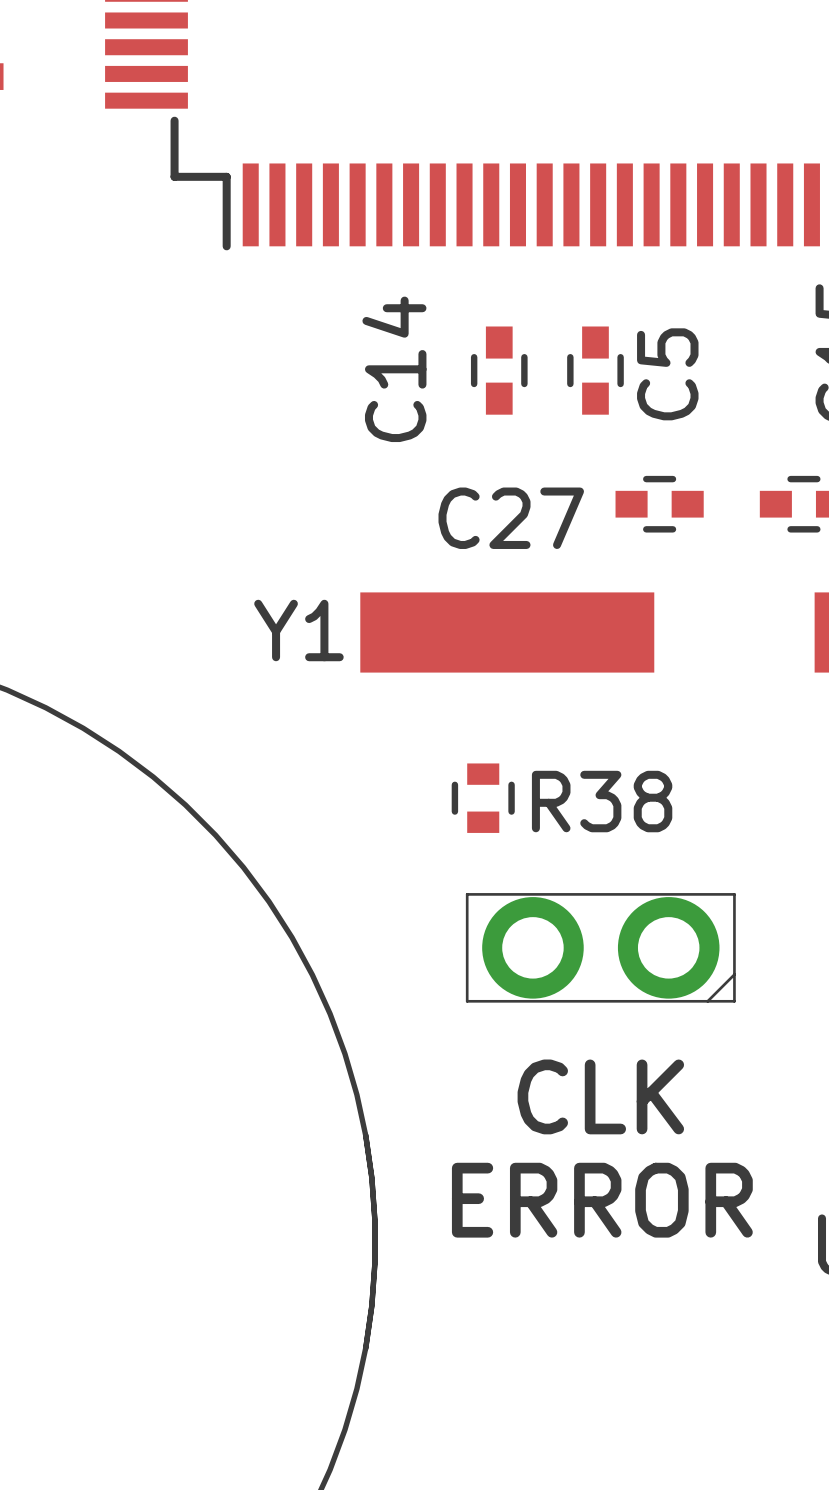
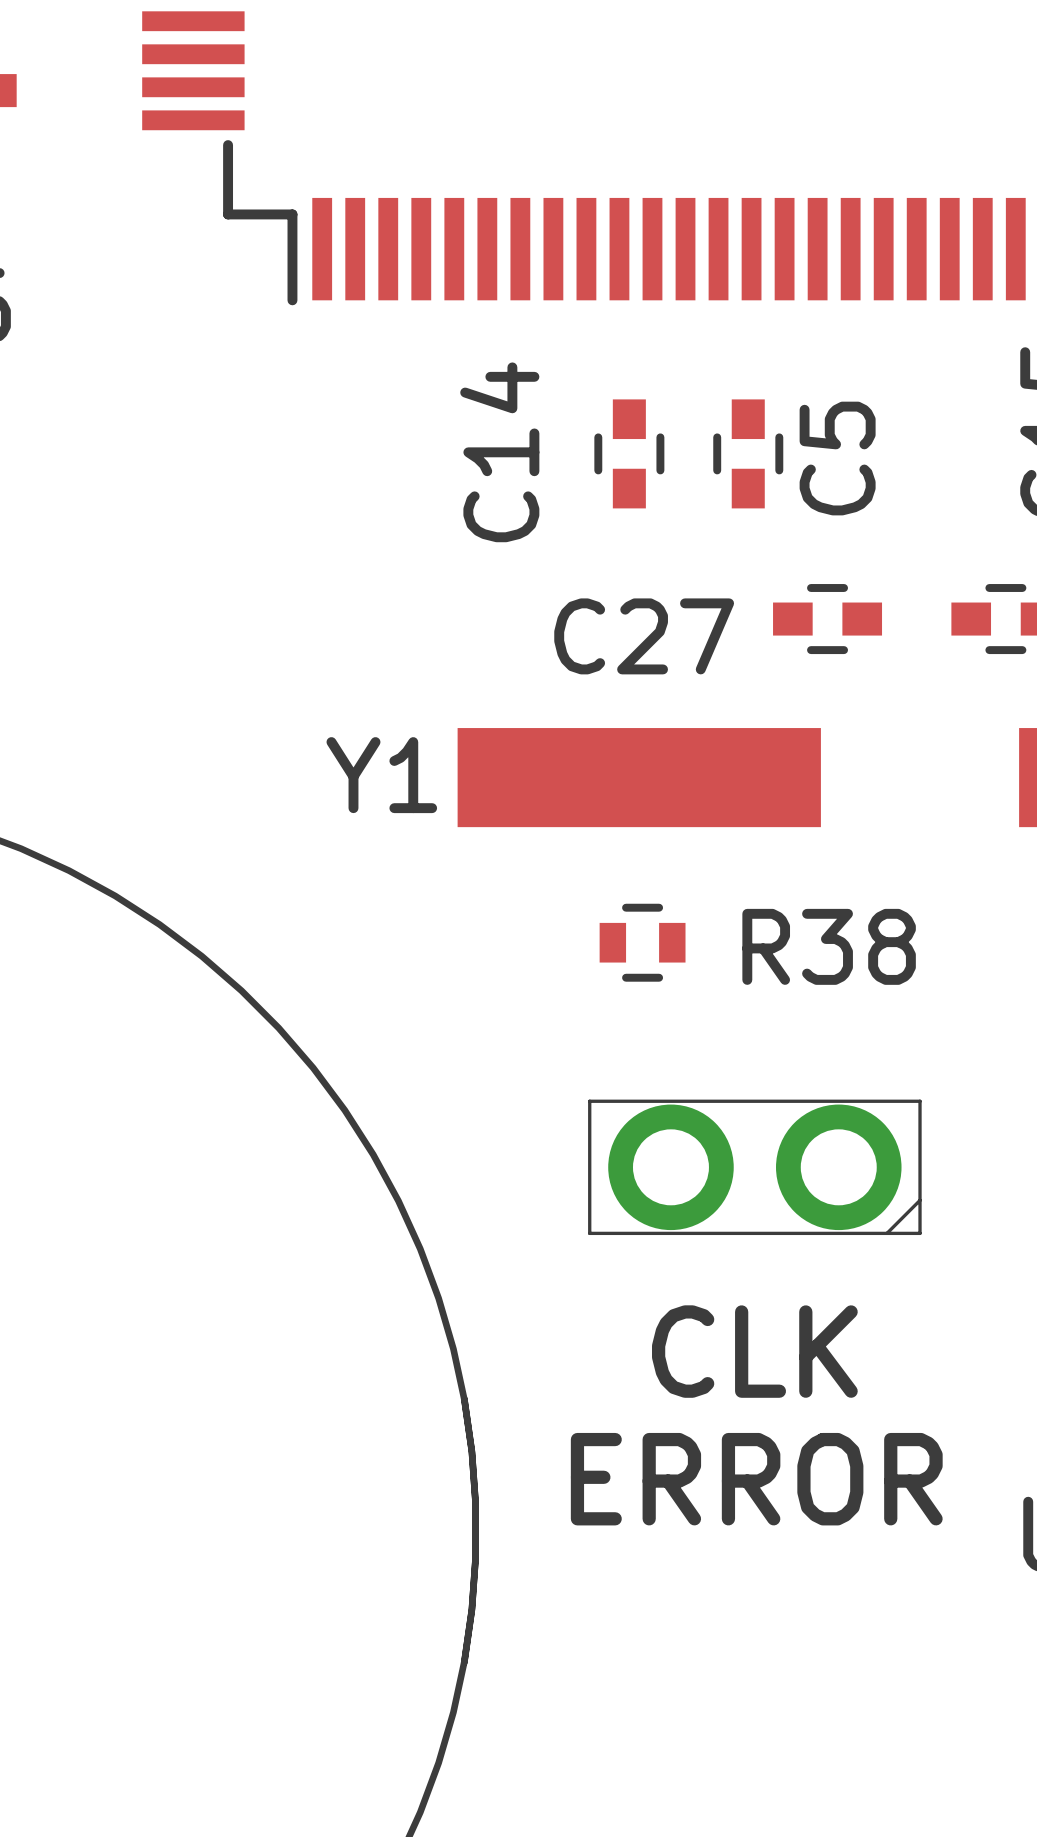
R38 rotation: 0° (483, 798) -> 90° clockwise (642, 942)
R38 position: (483, 798) -> (642, 942)

